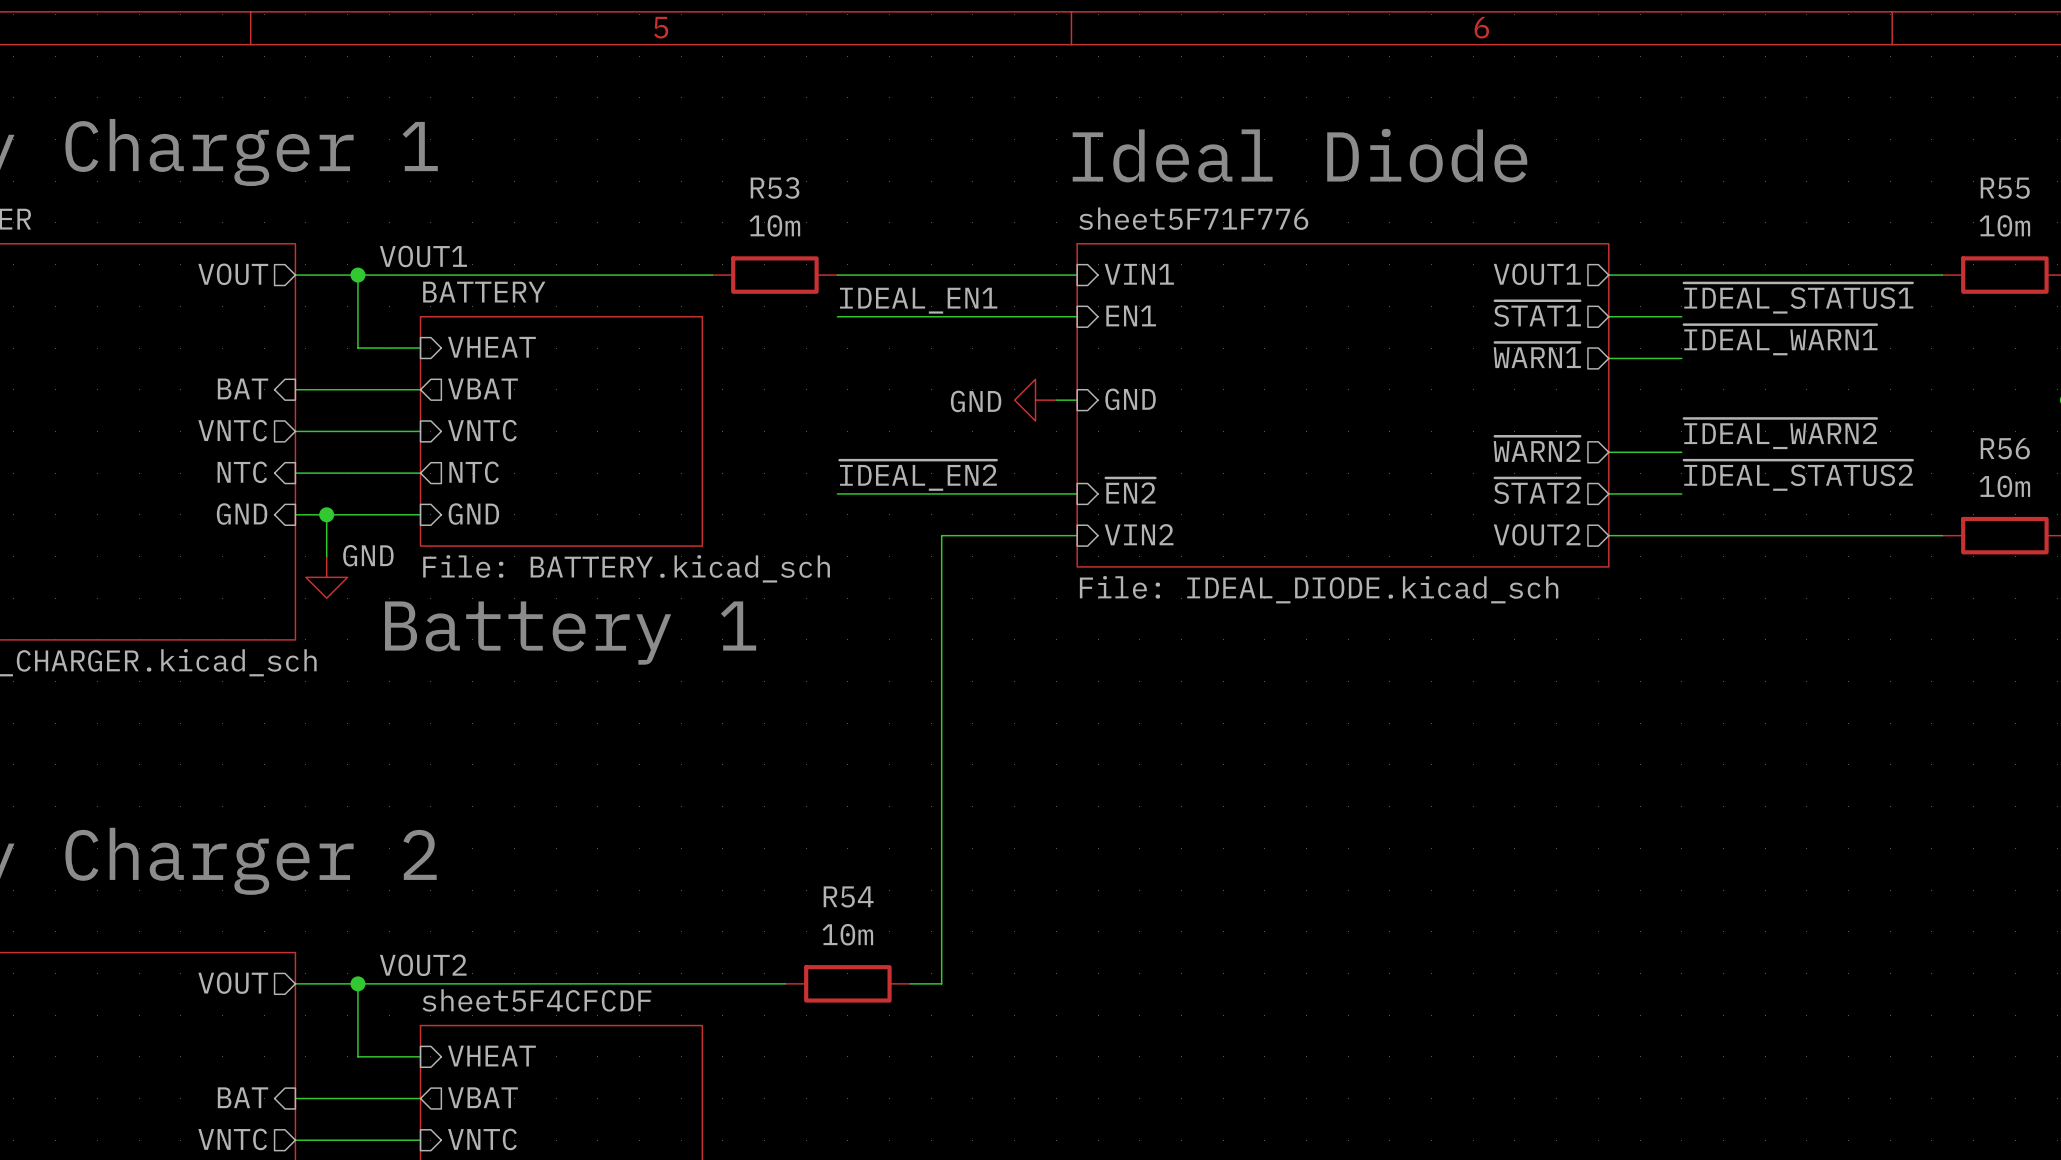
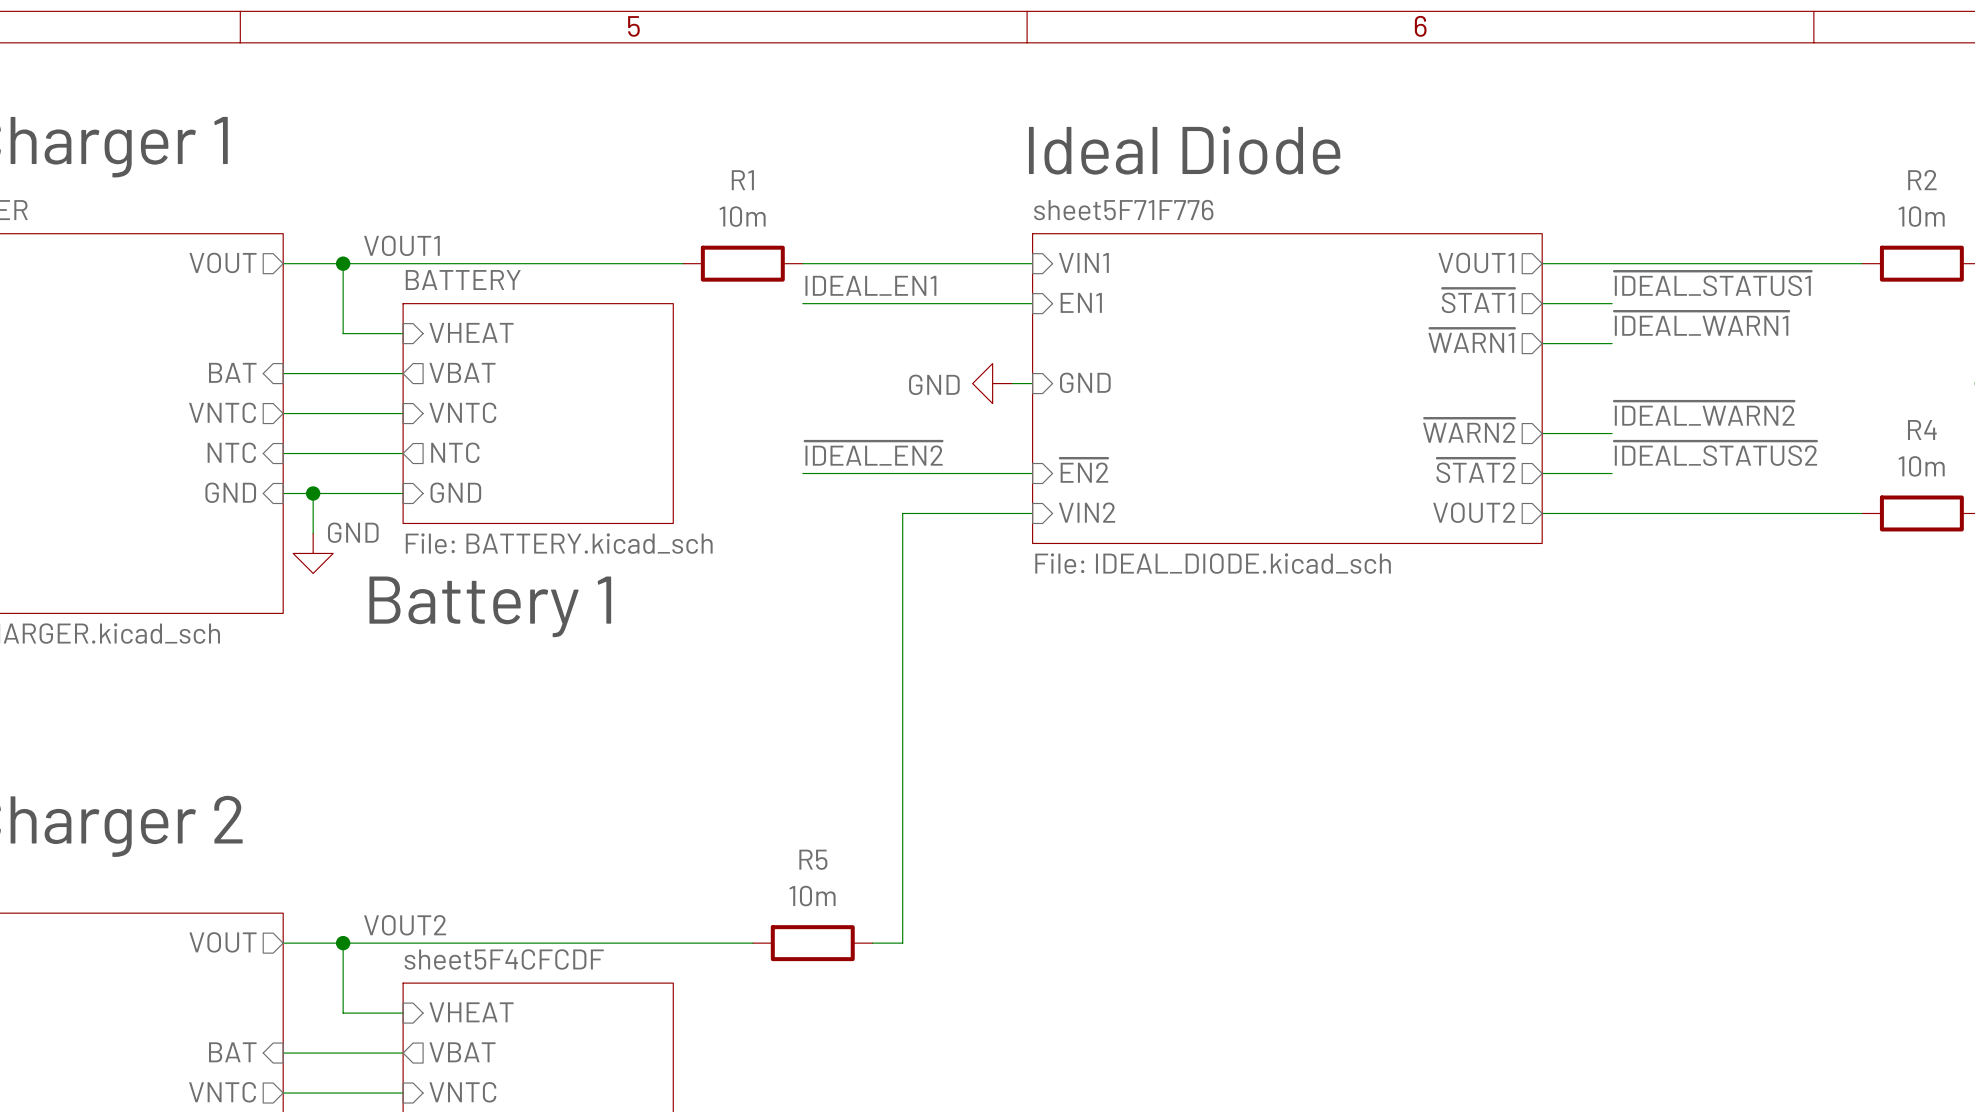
R53 name: R53 (775, 187) -> R1 (742, 180)
R55 name: R55 (2005, 188) -> R2 (1922, 180)
R56 name: R56 (2005, 448) -> R4 (1922, 430)
R54 name: R54 (848, 896) -> R5 (813, 859)

